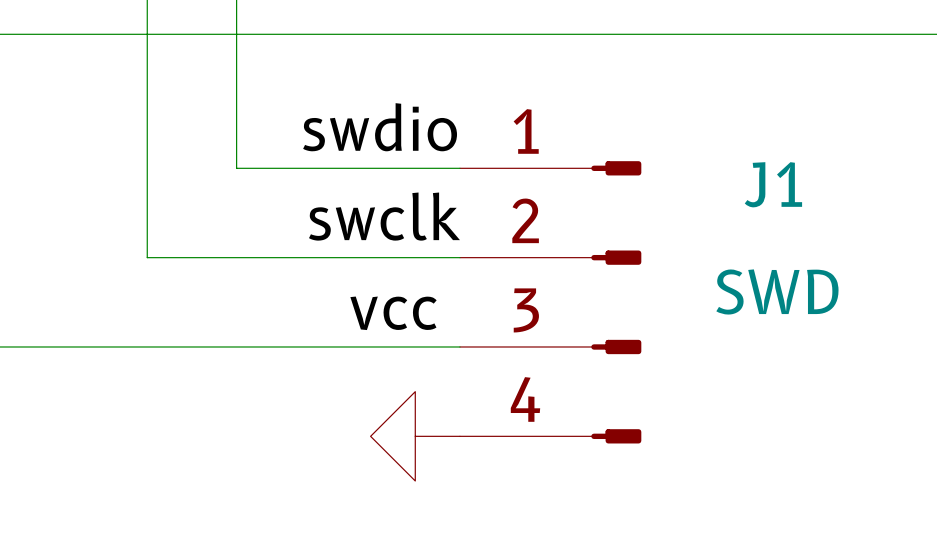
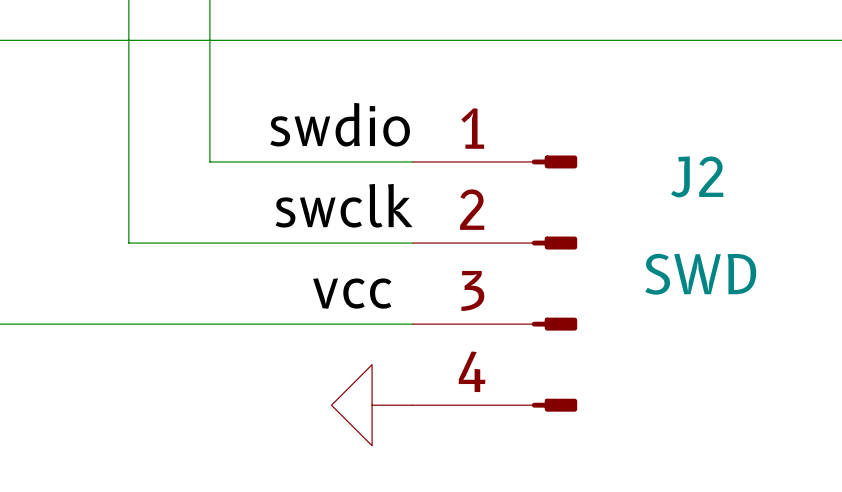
J1 name: J1 (773, 184) -> J2 (697, 176)

